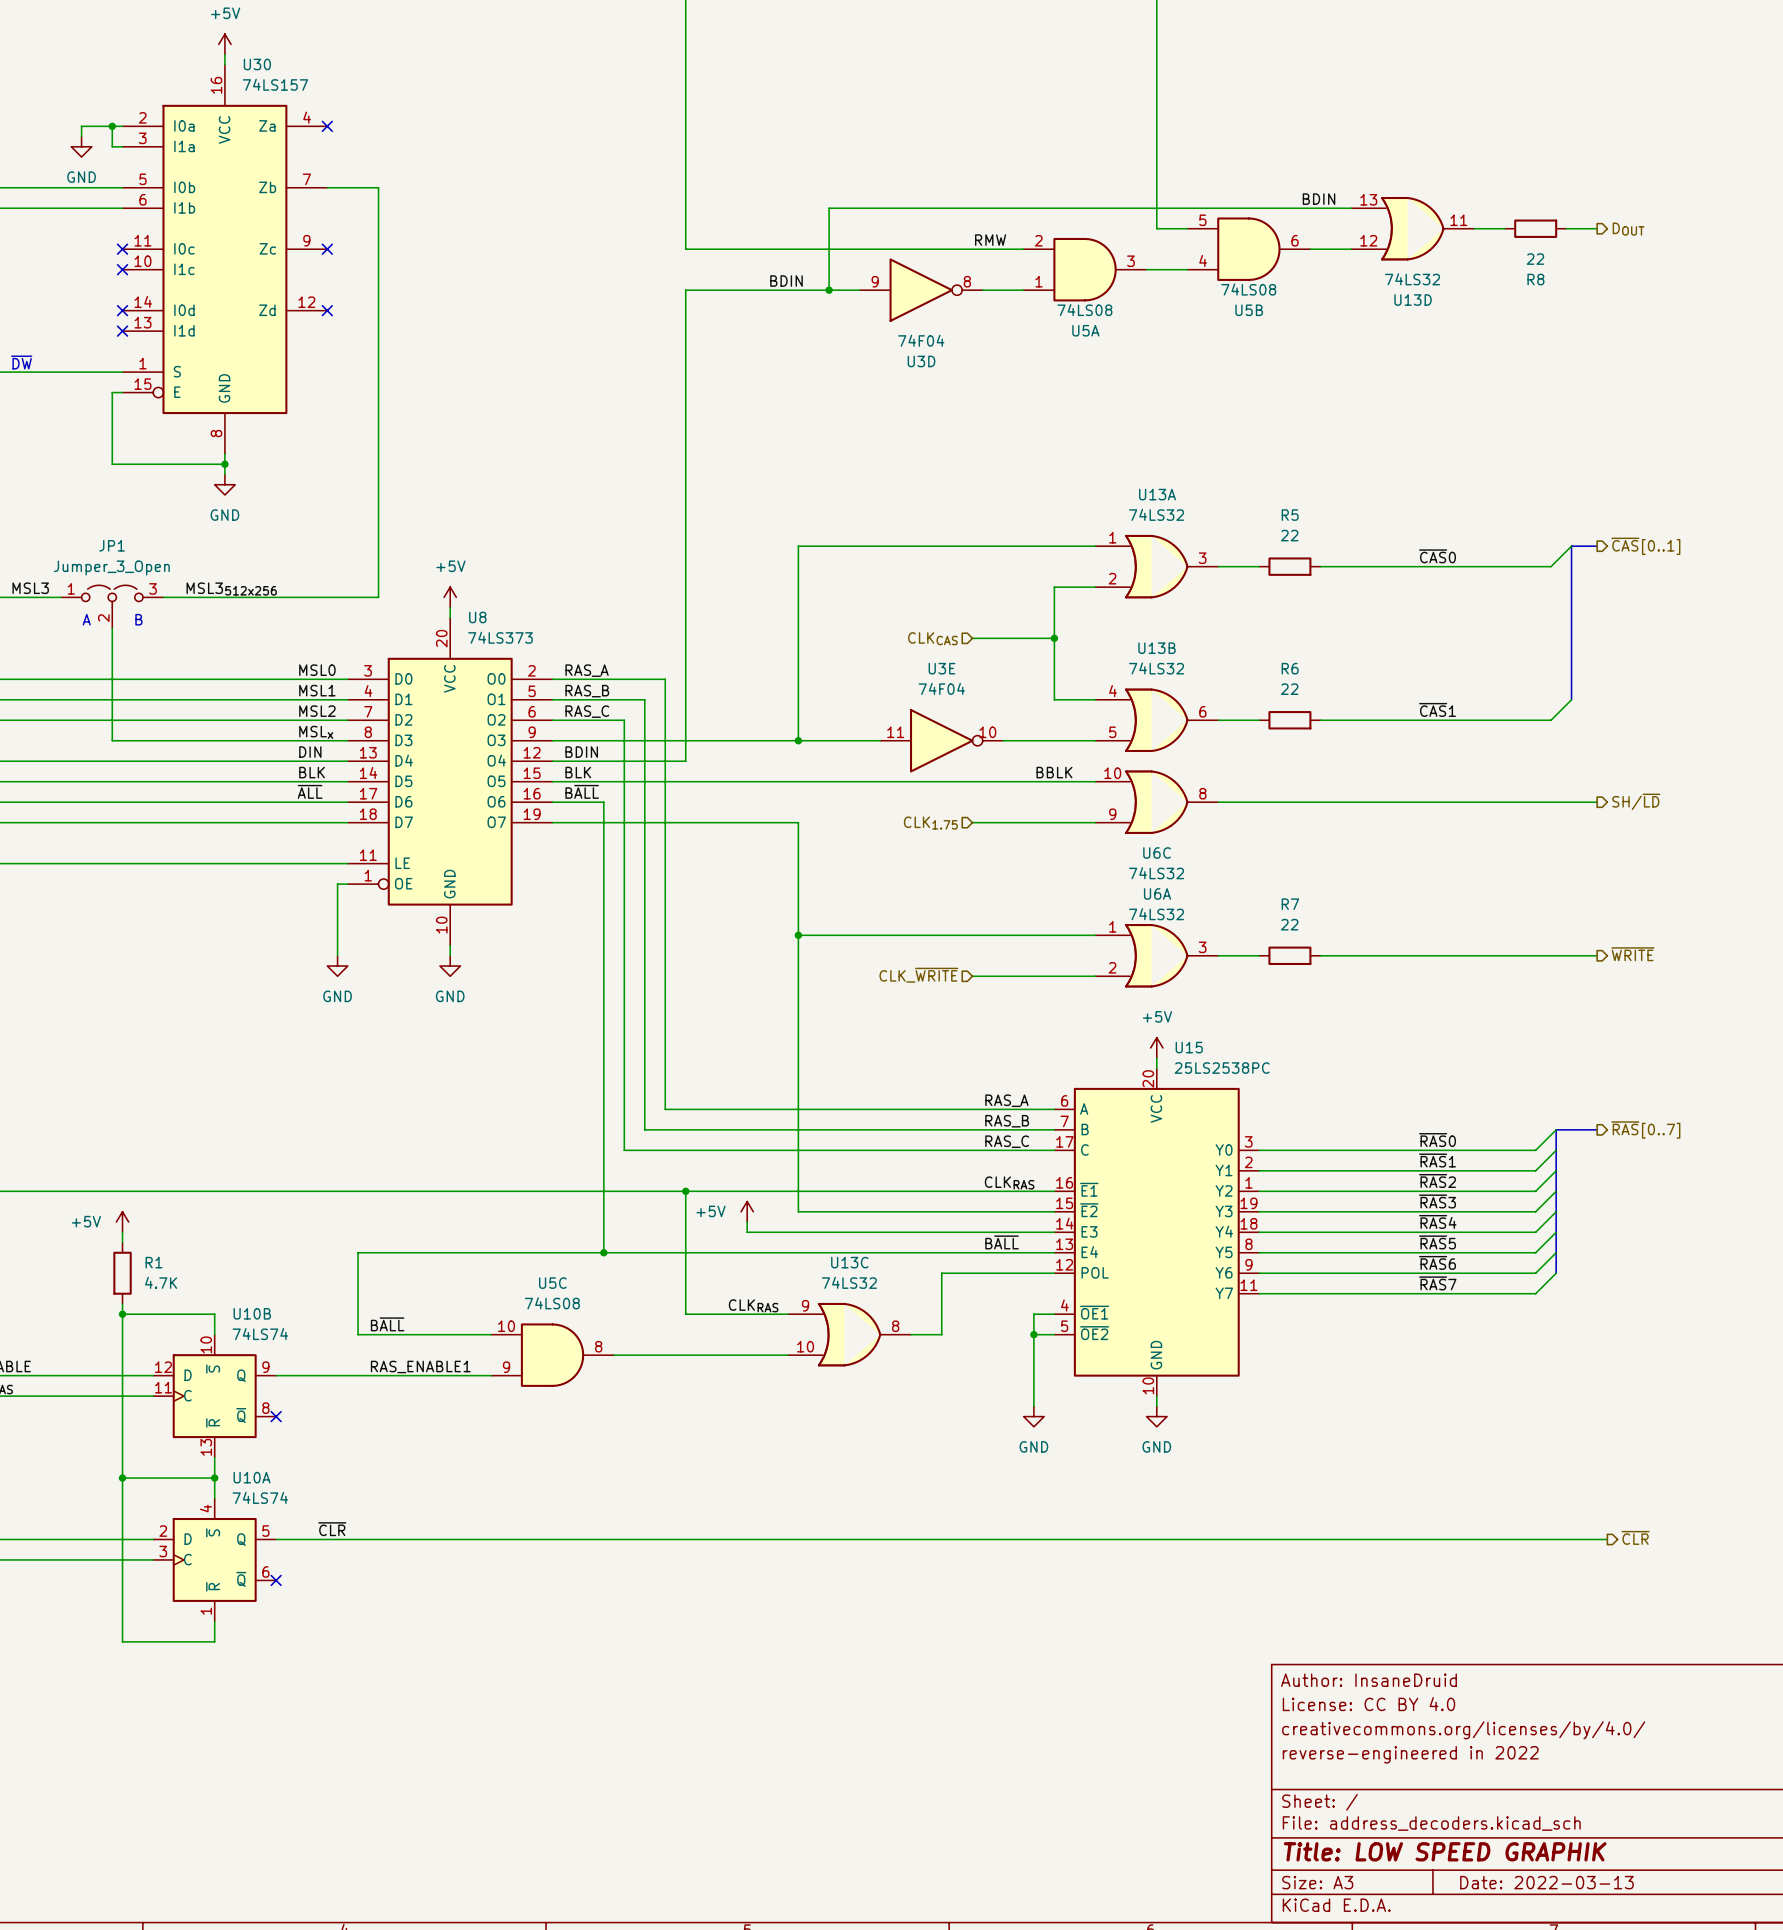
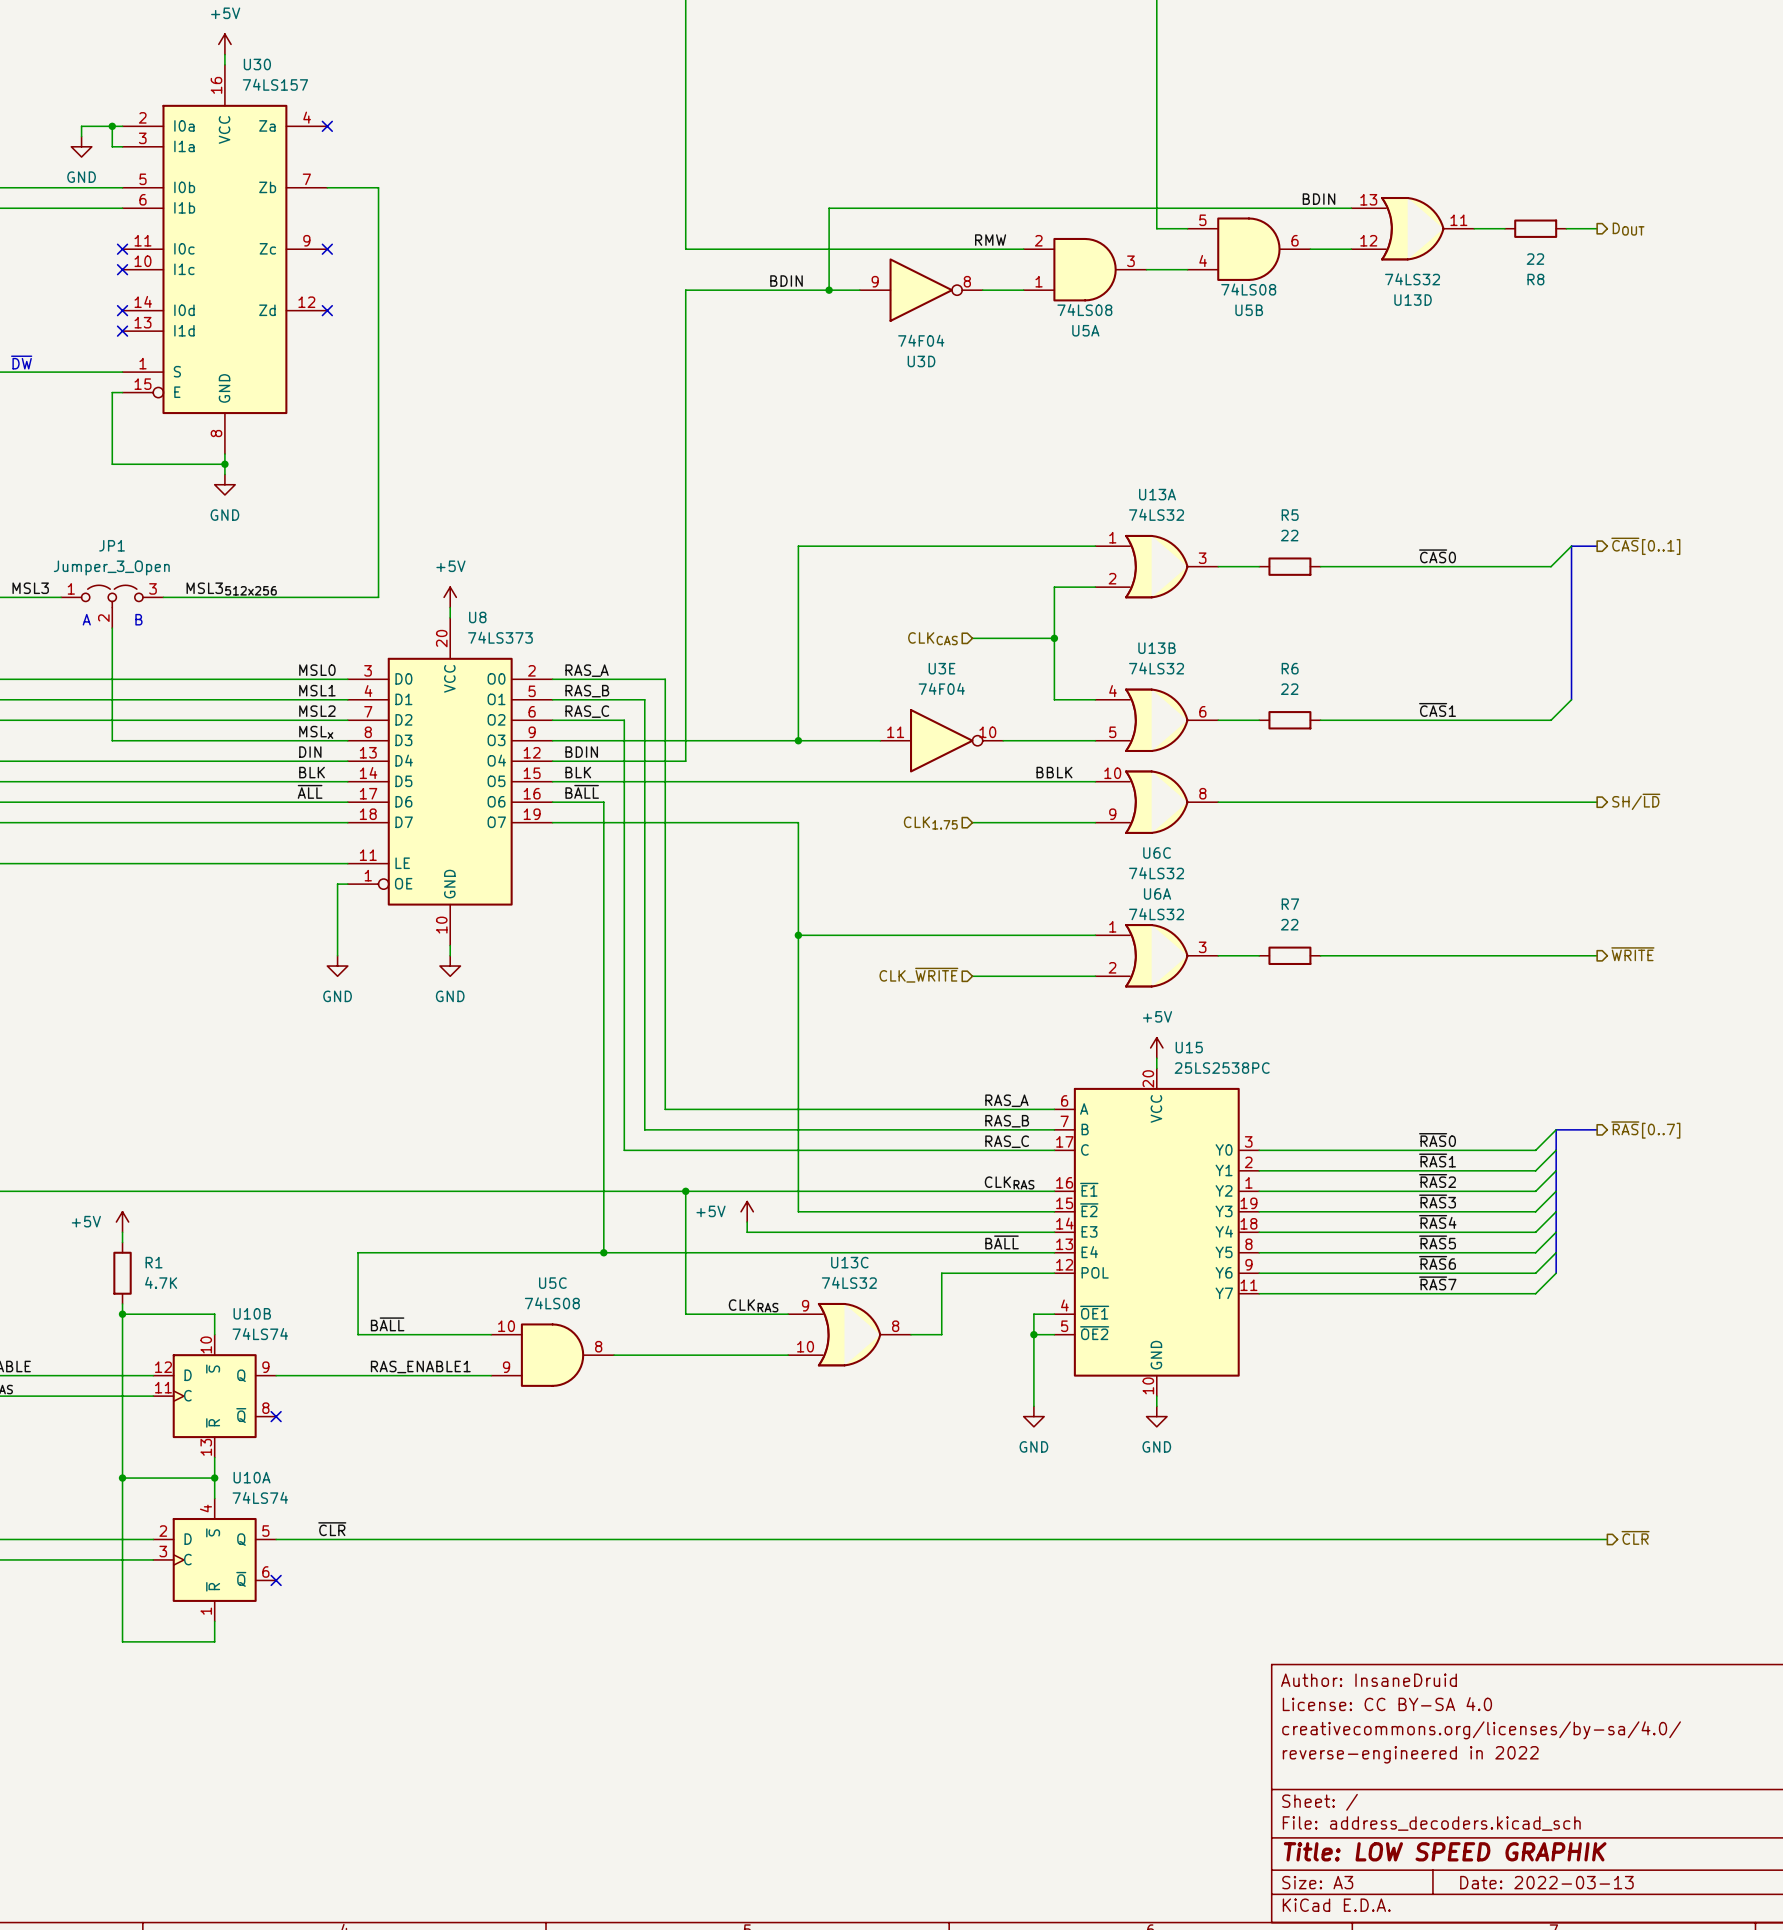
title block: License: CC BY 4.0 (1368, 1704) -> License: CC BY-SA 4.0 (1387, 1704)
title block: creativecommons.org/licenses/by/4.0/ (1463, 1730) -> creativecommons.org/licenses/by-sa/4.0/ (1481, 1730)

